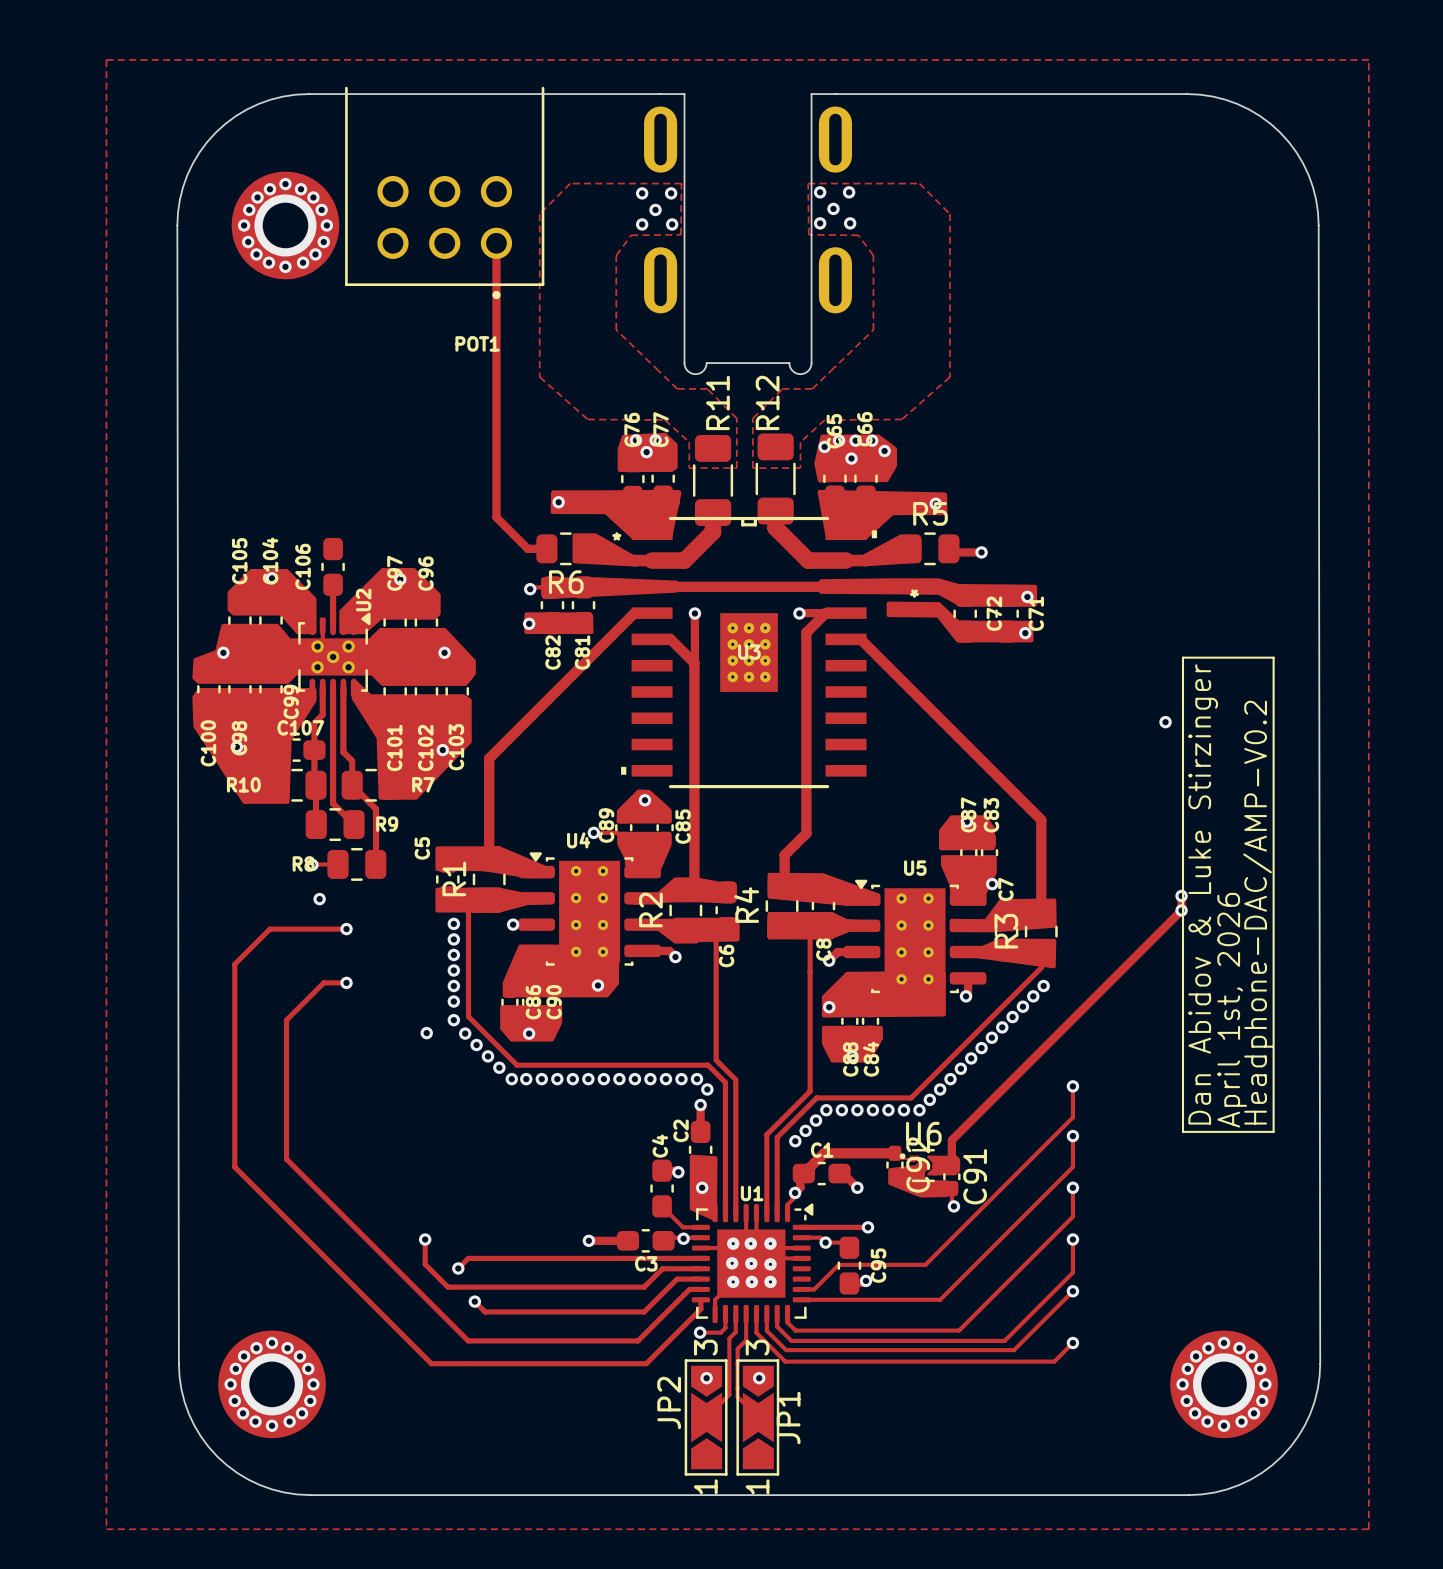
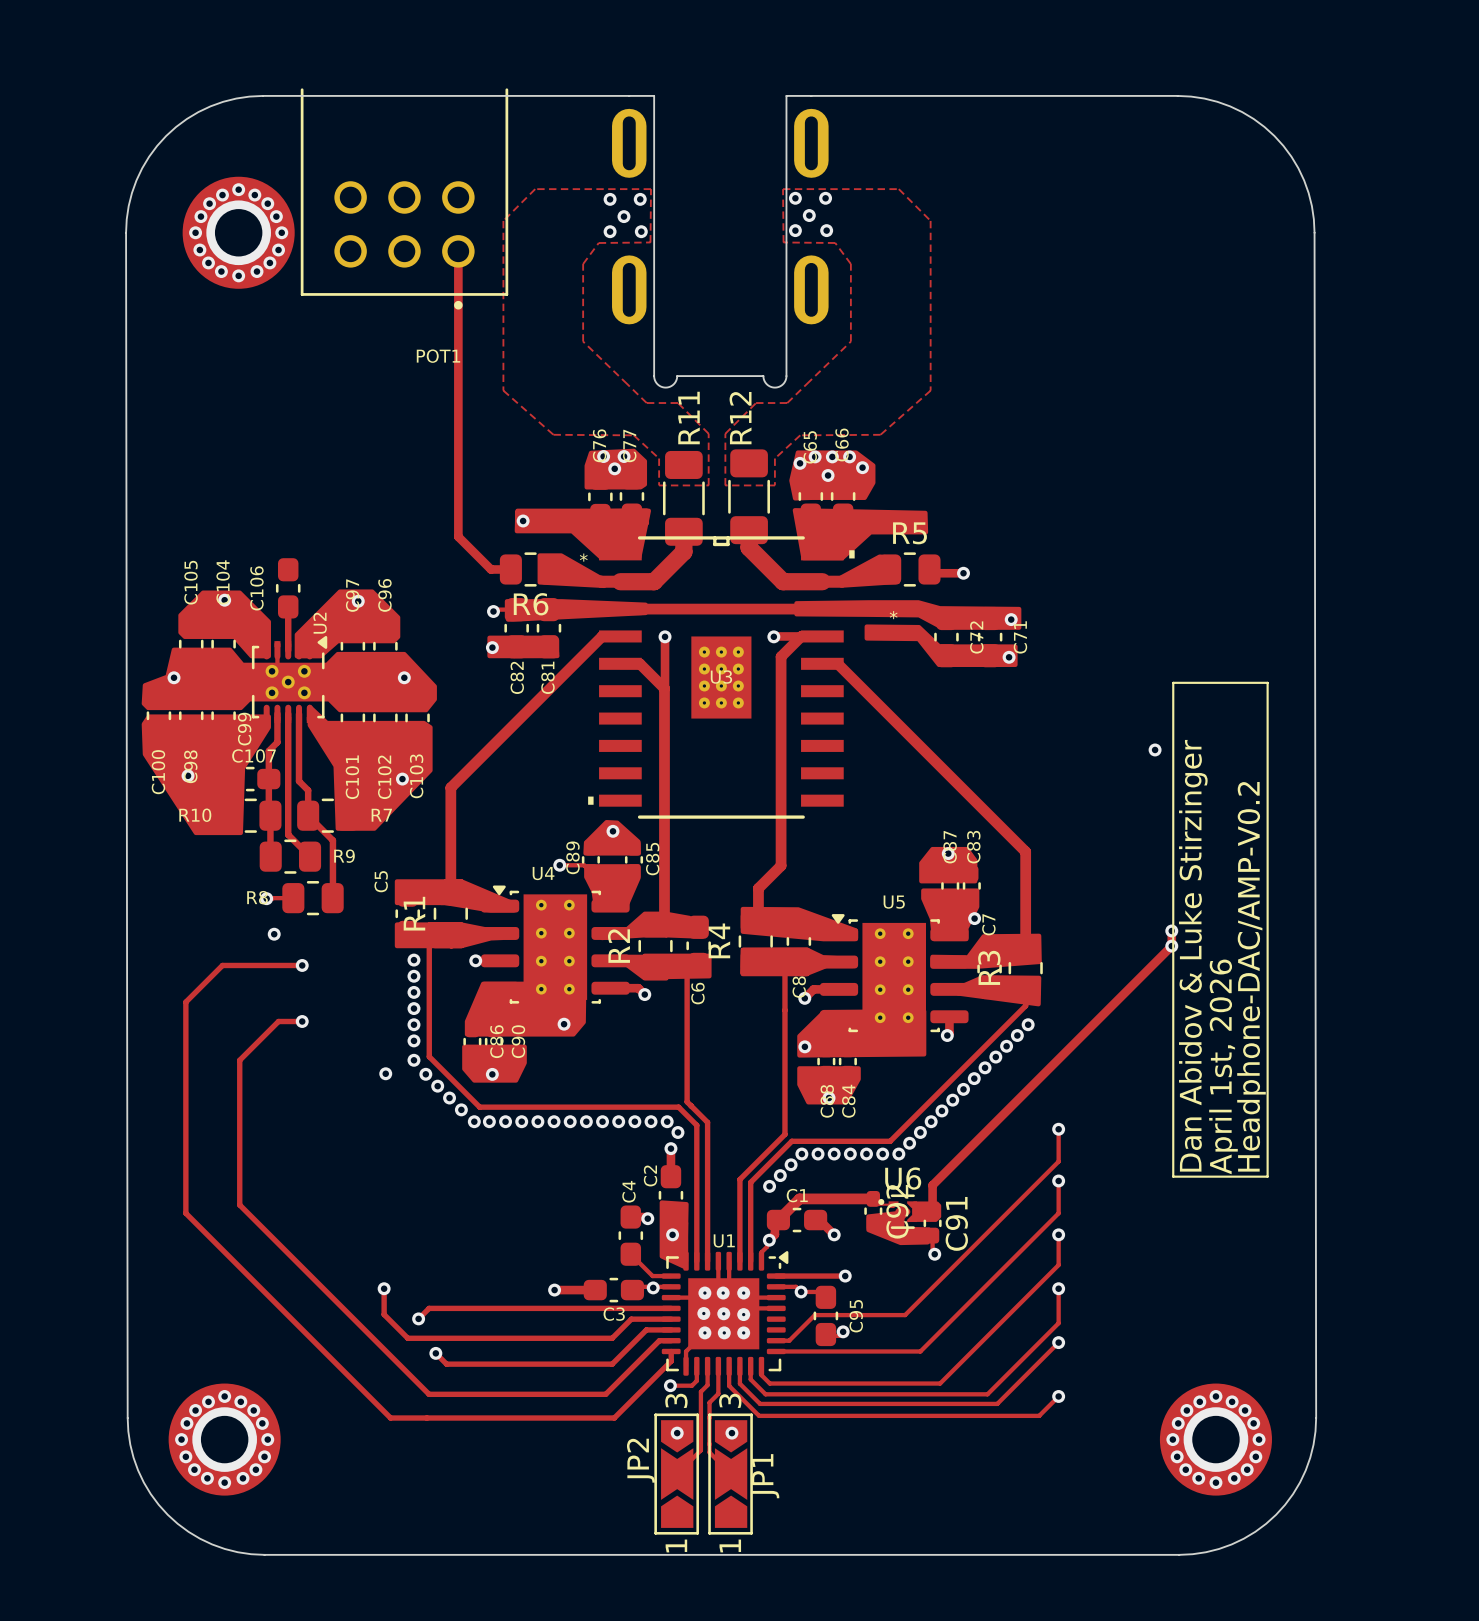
zone outline: (106, 59) (106, 1529) (1368, 1529) (1368, 59) (106, 59) -> none
via: (935, 503) -> none

